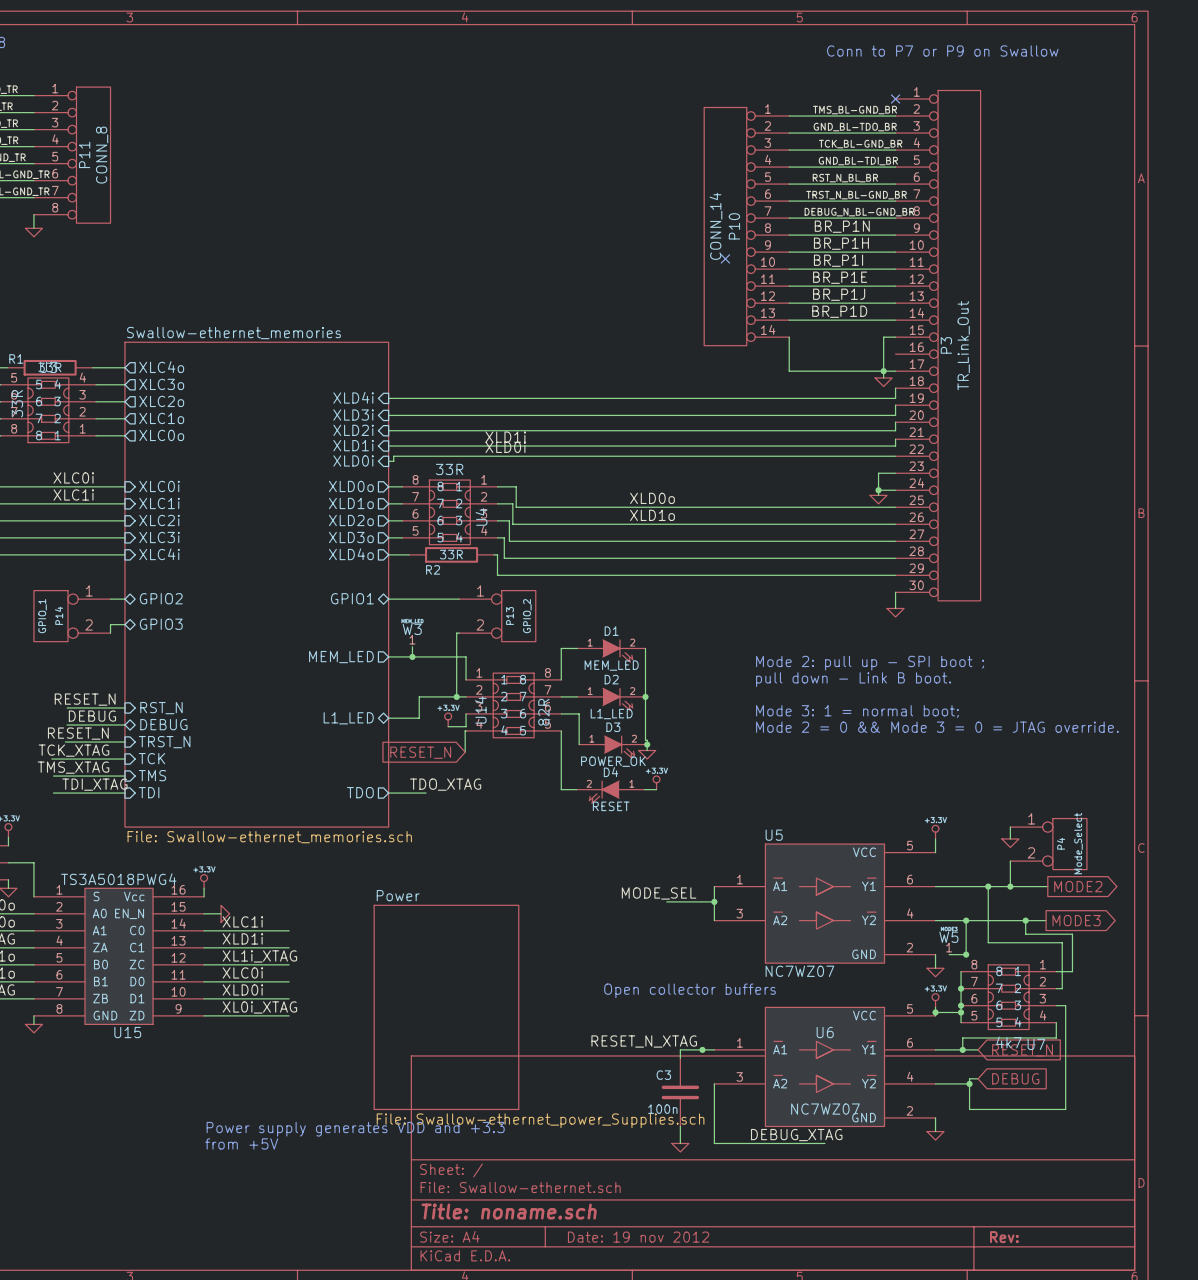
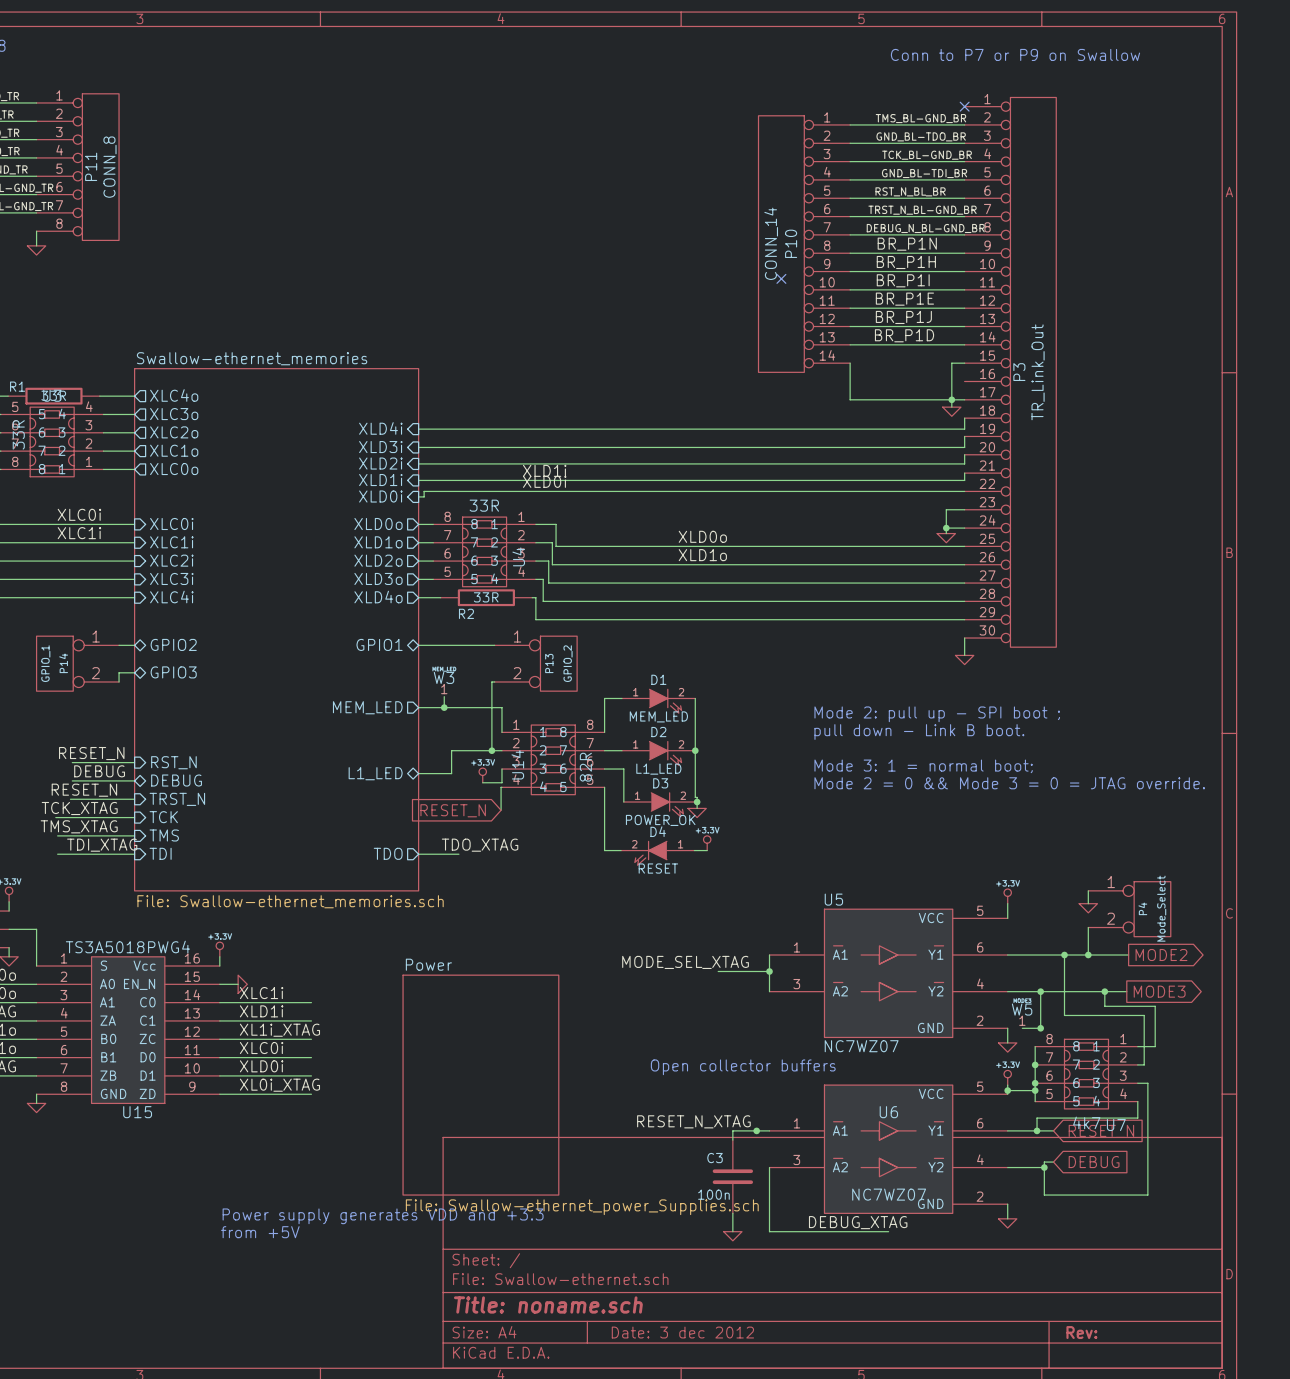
label: MODE_SEL (659, 893) -> MODE_SEL_XTAG (685, 962)
title block: Date: 19 nov 2012 (638, 1237) -> Date: 3 dec 2012 (682, 1332)

